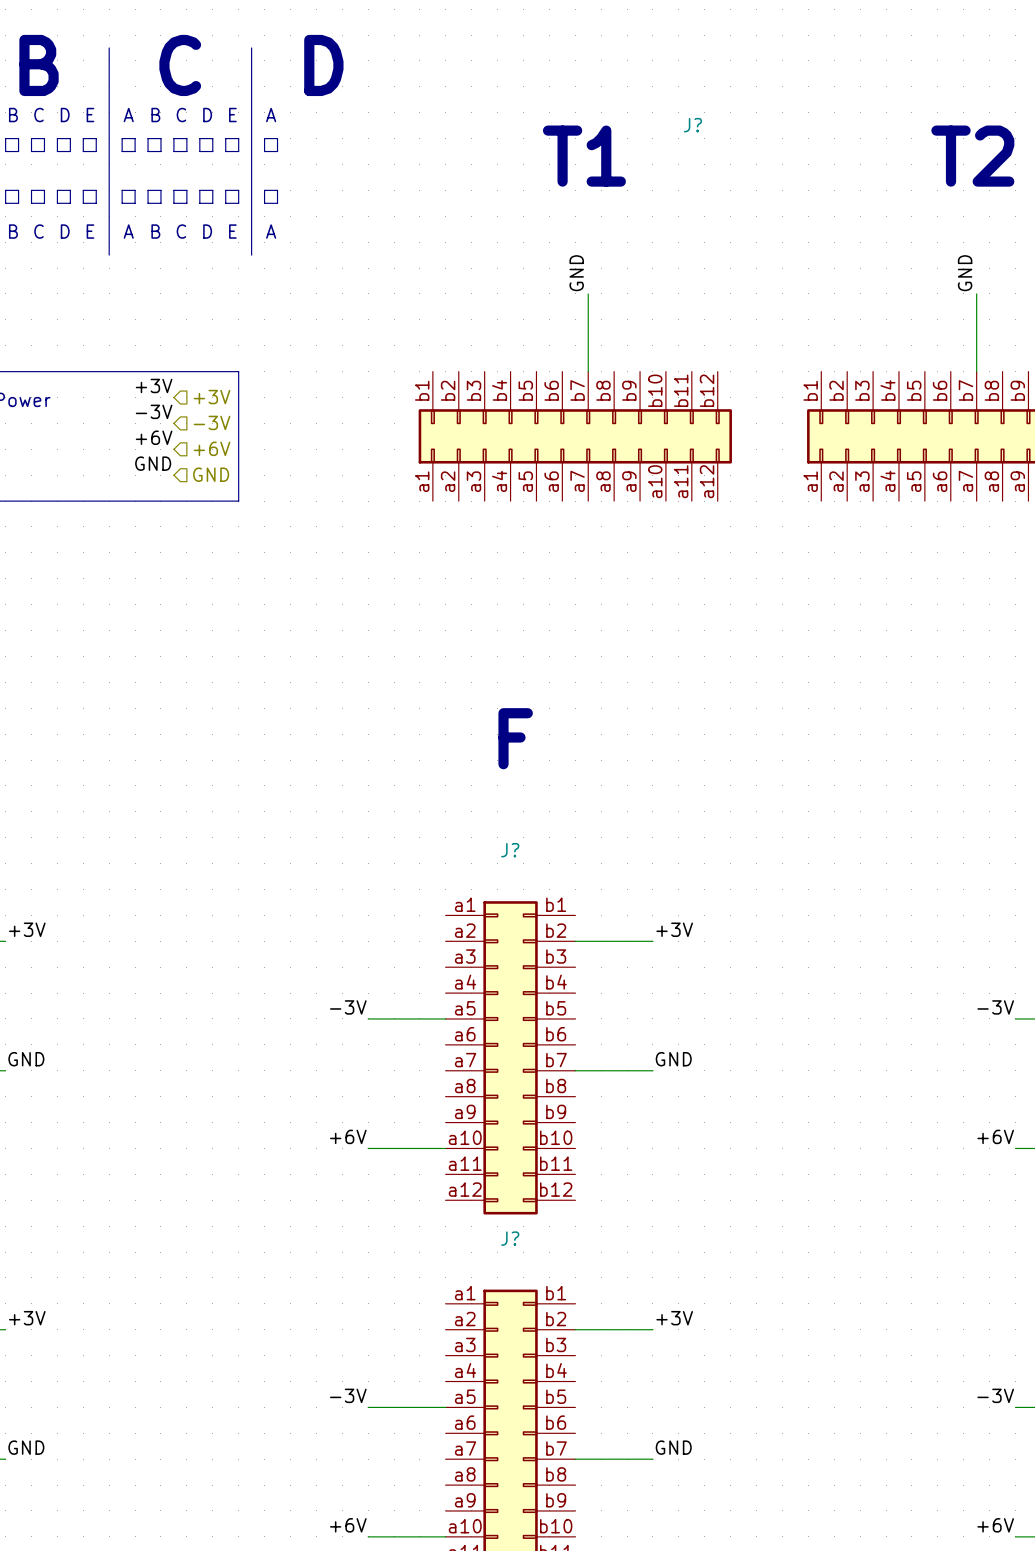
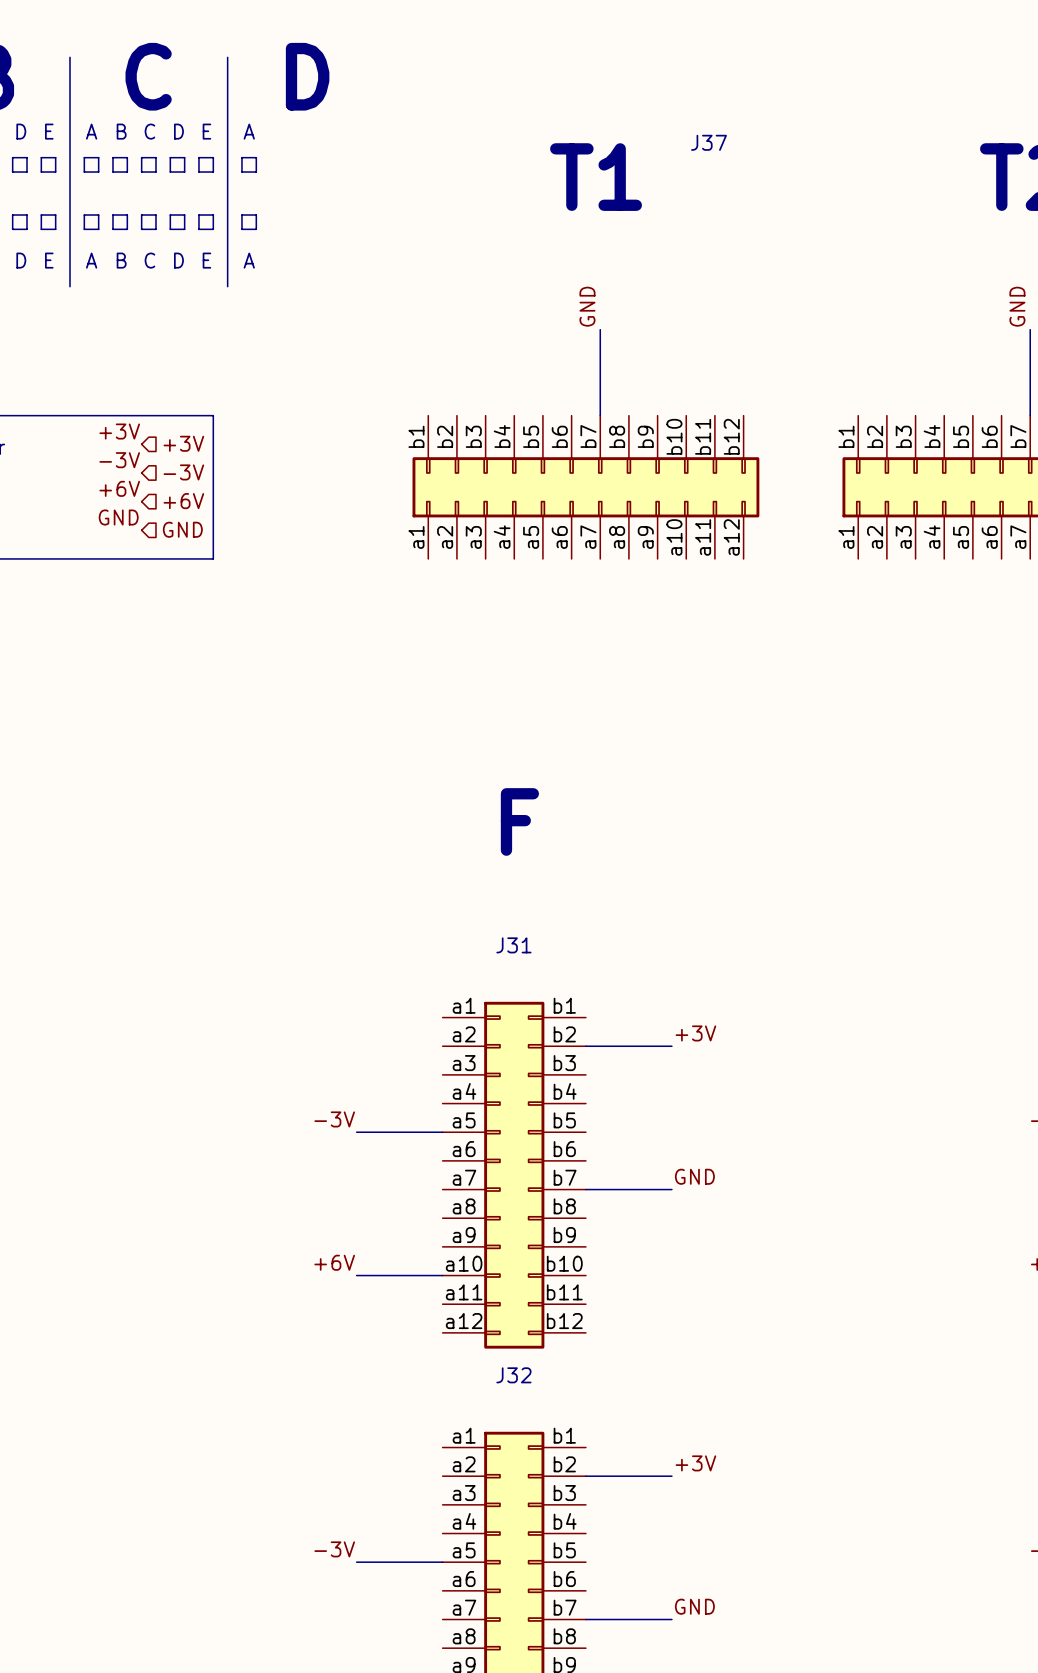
J? name: J? (692, 125) -> J37 (709, 142)
J? name: J? (510, 850) -> J31 (513, 945)
J? name: J? (510, 1238) -> J32 (513, 1375)

